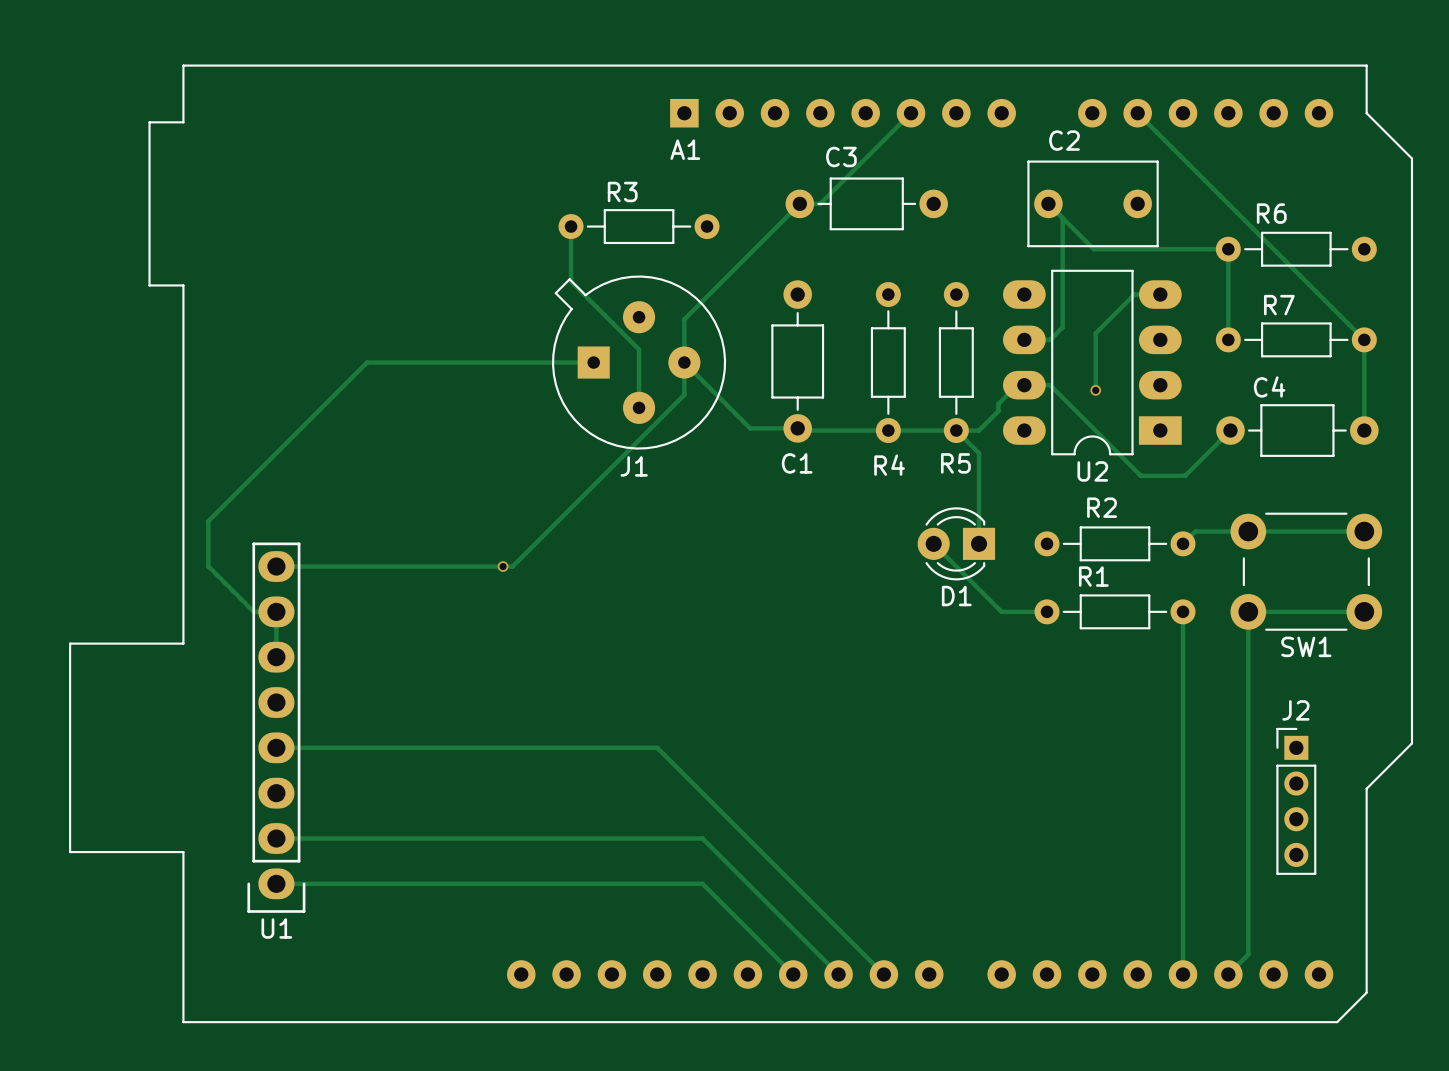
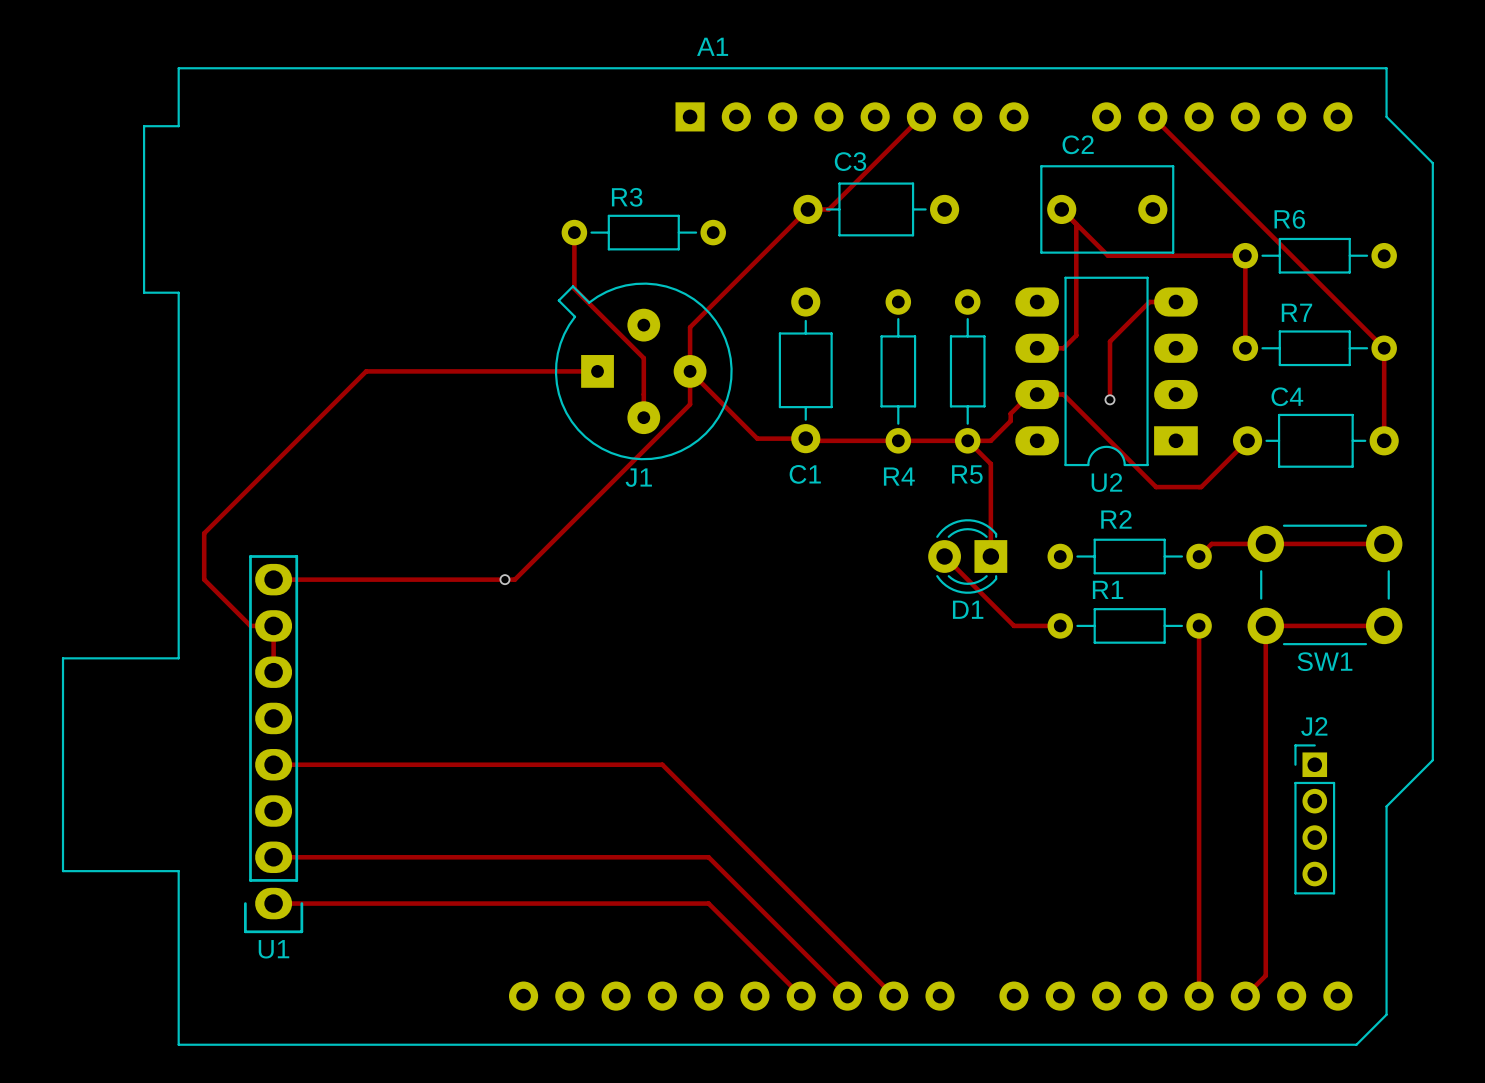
A1 name position: A1 (685, 149) -> A1 (712, 46)

